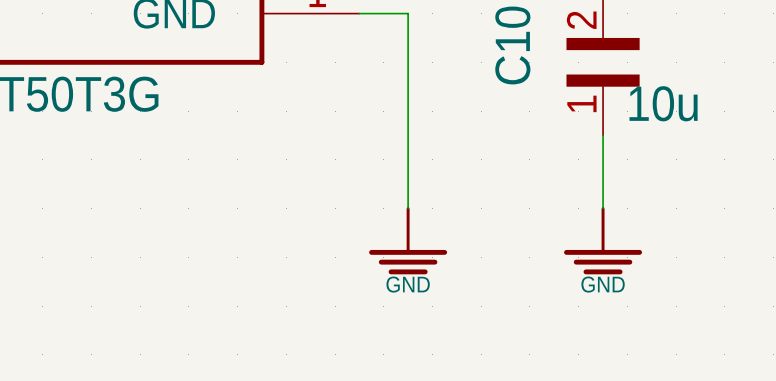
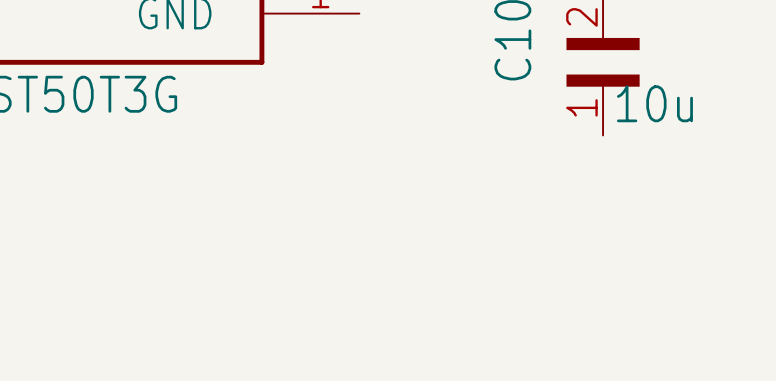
wire: (359, 13) (408, 13) (408, 208) -> none
wire: (603, 135) (603, 208) -> none
power symbol: (408, 240) -> none
power symbol: (603, 240) -> none

